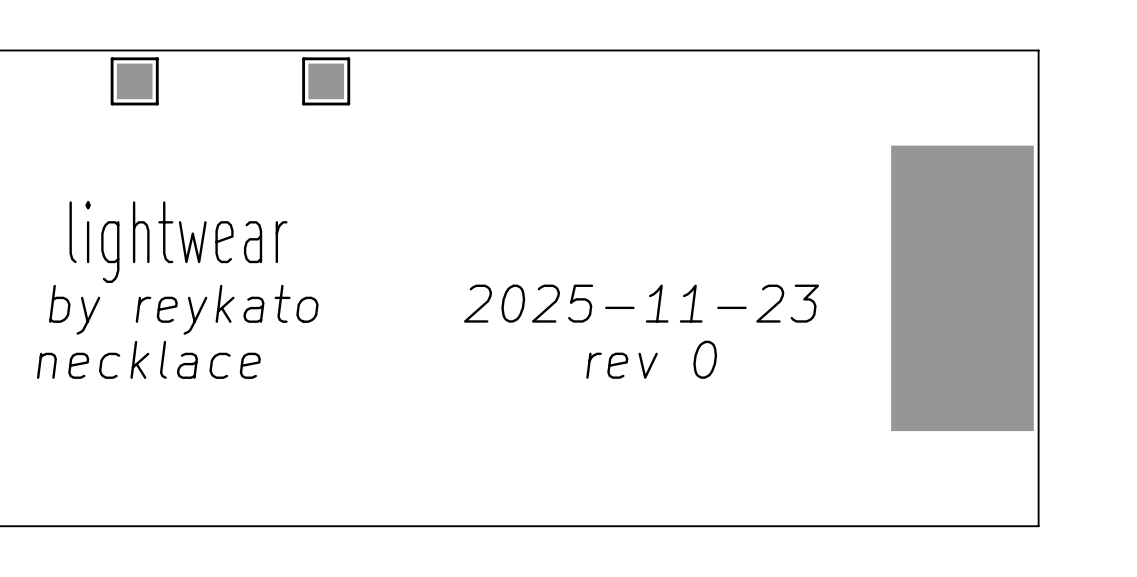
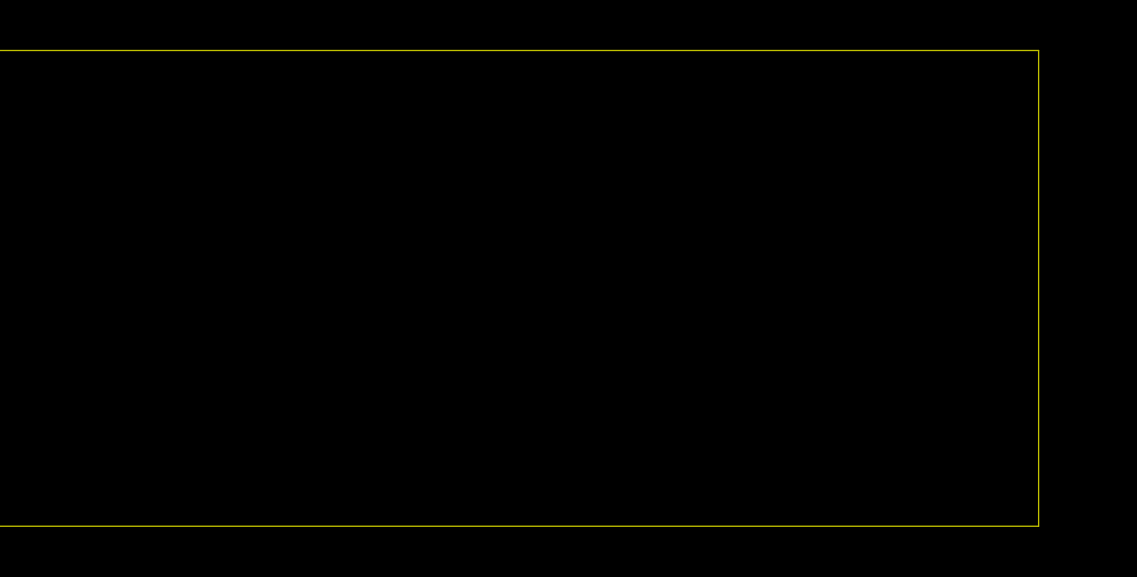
part: (134, 81) -> none
part: (326, 81) -> none
text: lightwear (178, 242) -> none
part: (962, 288) -> none
text: 2025-11-23 (641, 303) -> none
text: by reykato (183, 309) -> none
text: necklace (148, 359) -> none
text: rev 0 (651, 359) -> none

